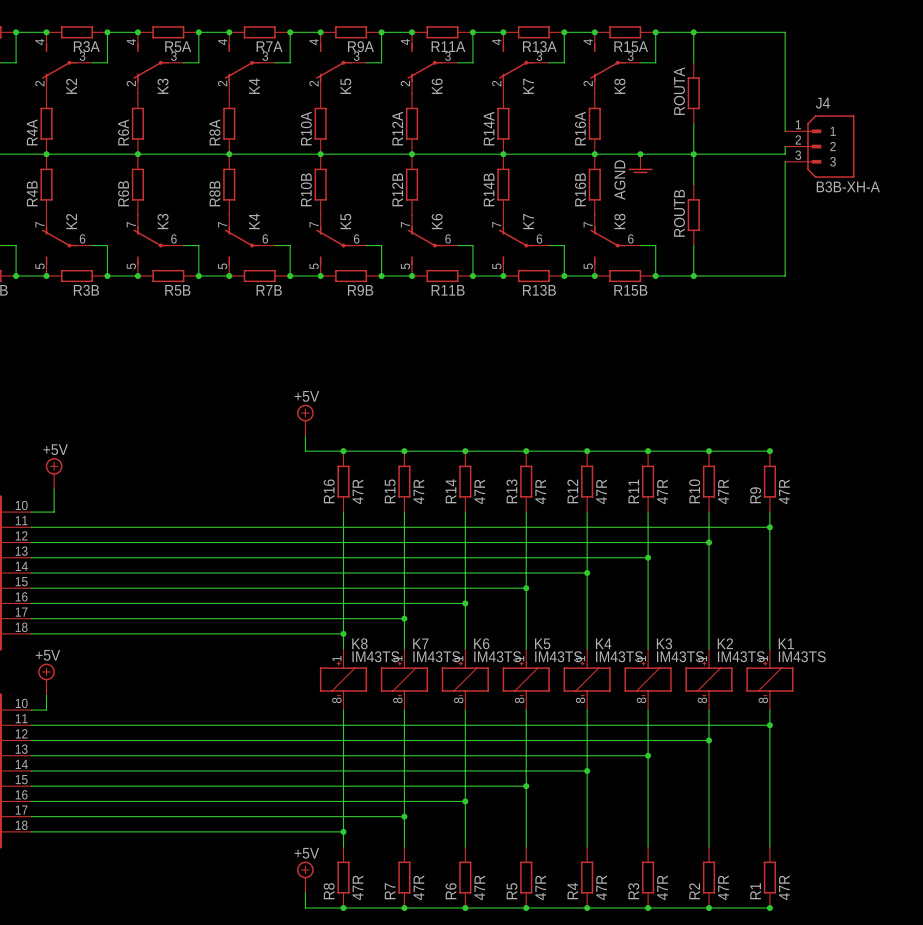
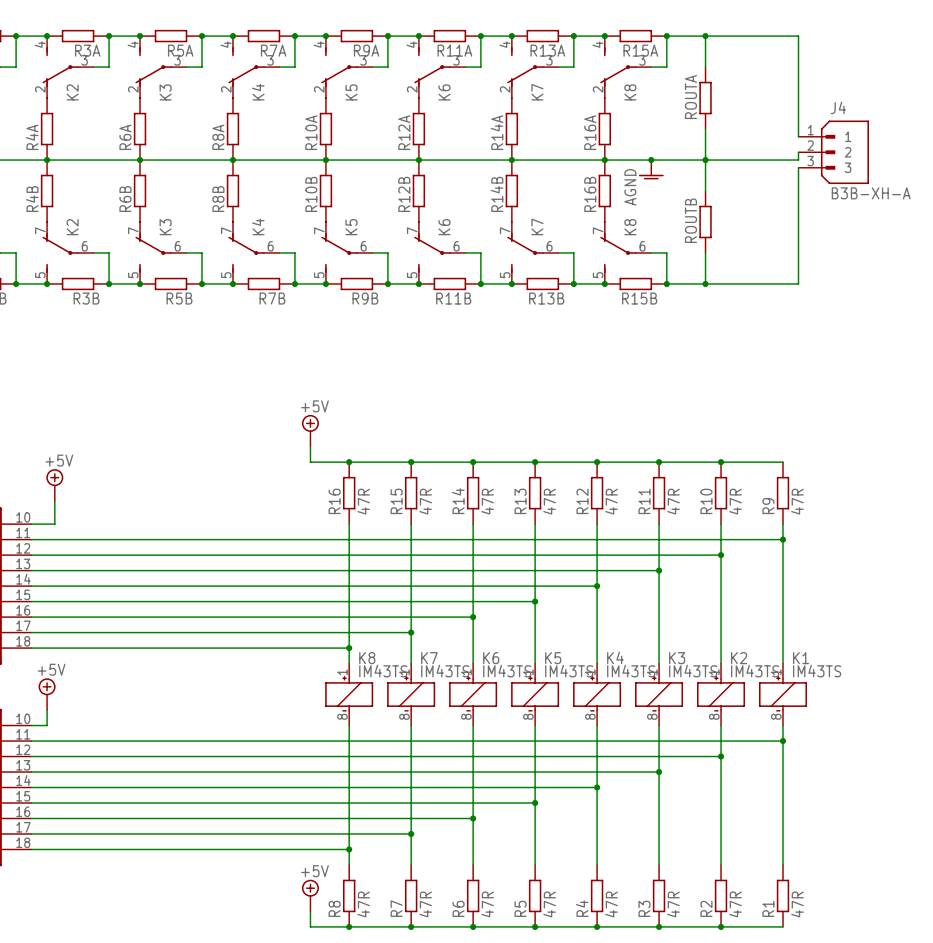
junction: (769, 451) -> none
junction: (769, 908) -> none

